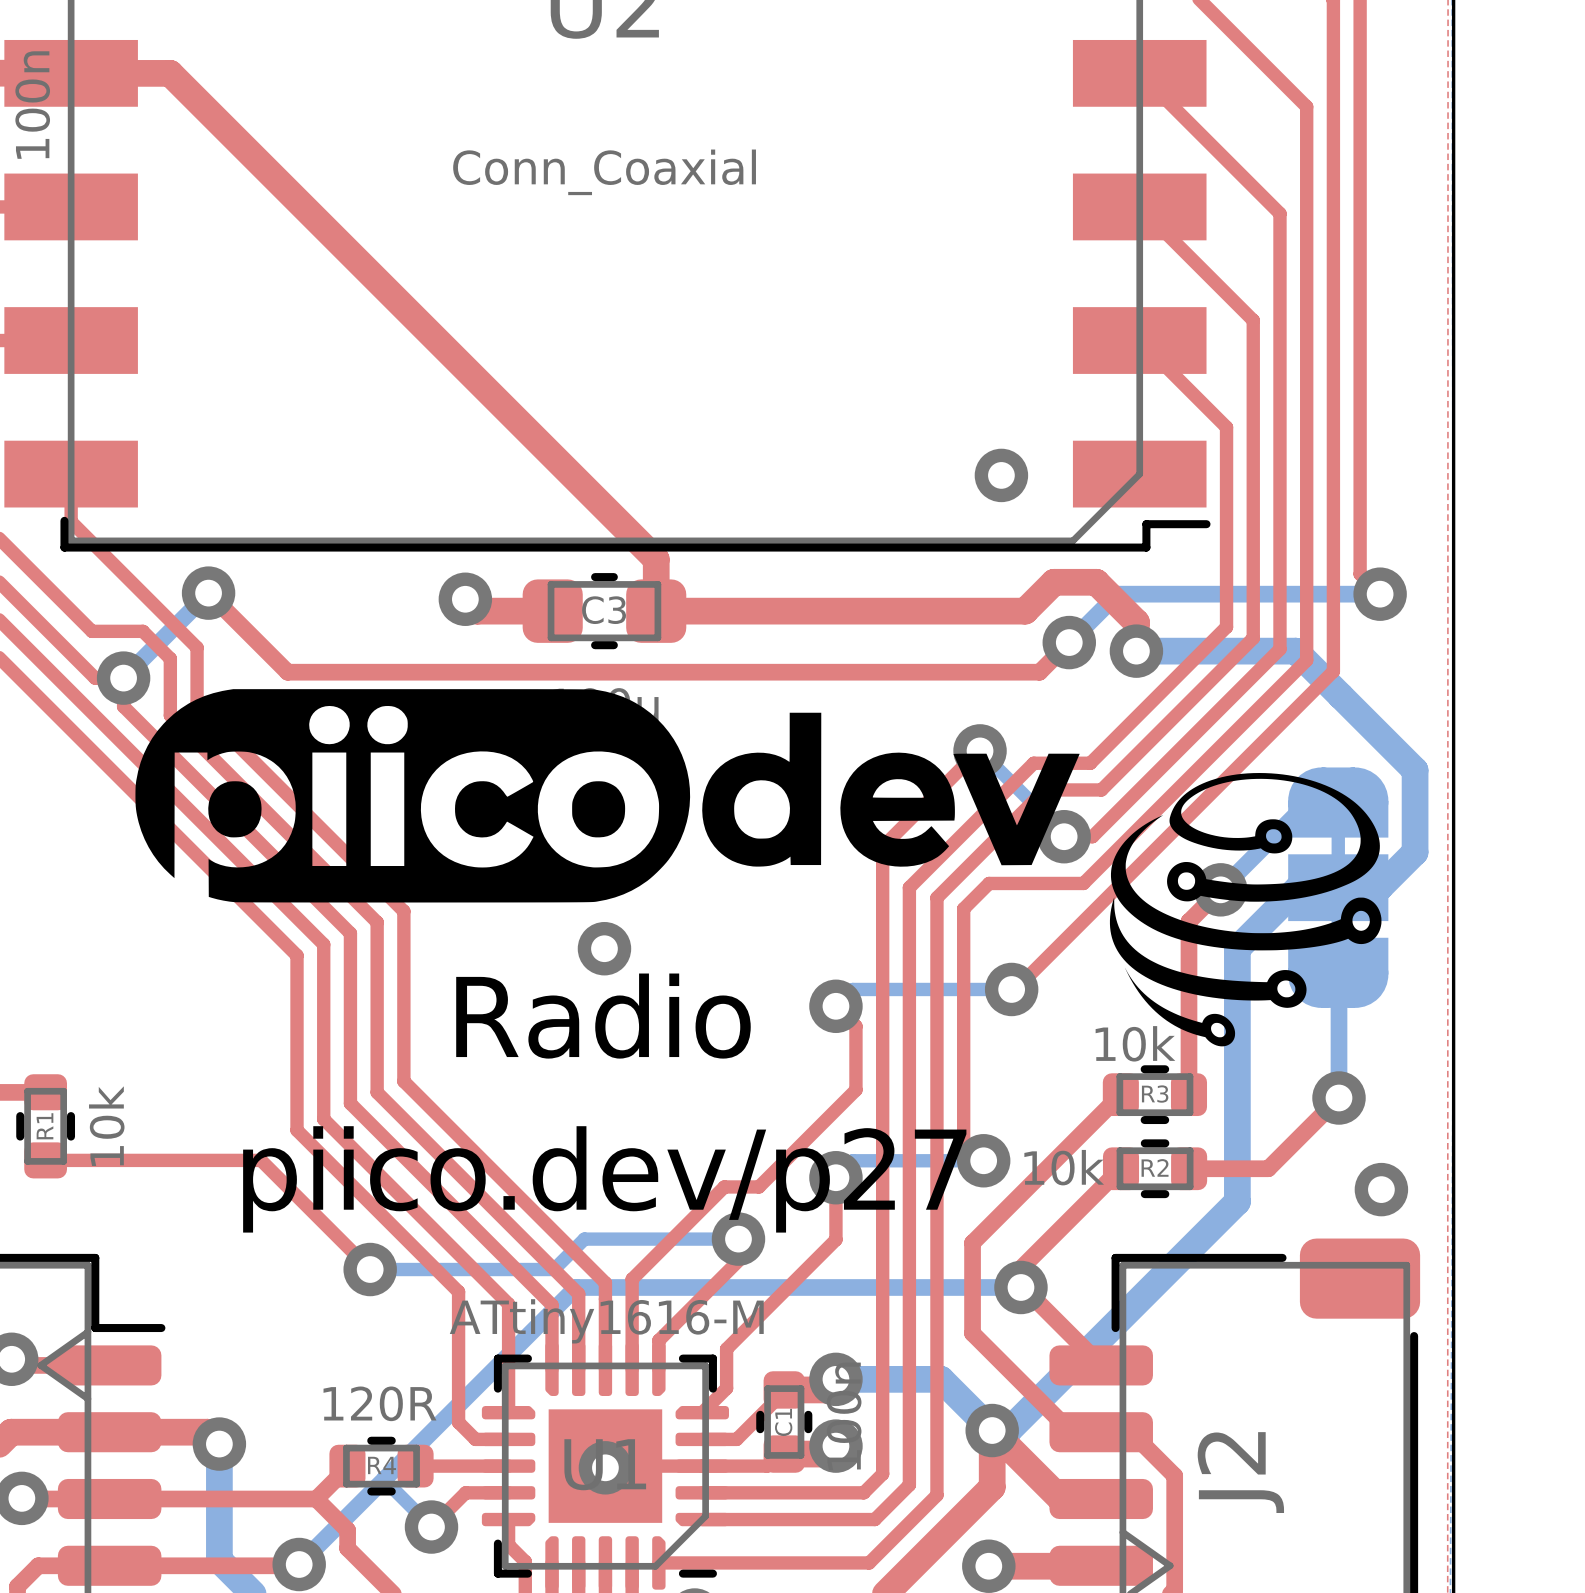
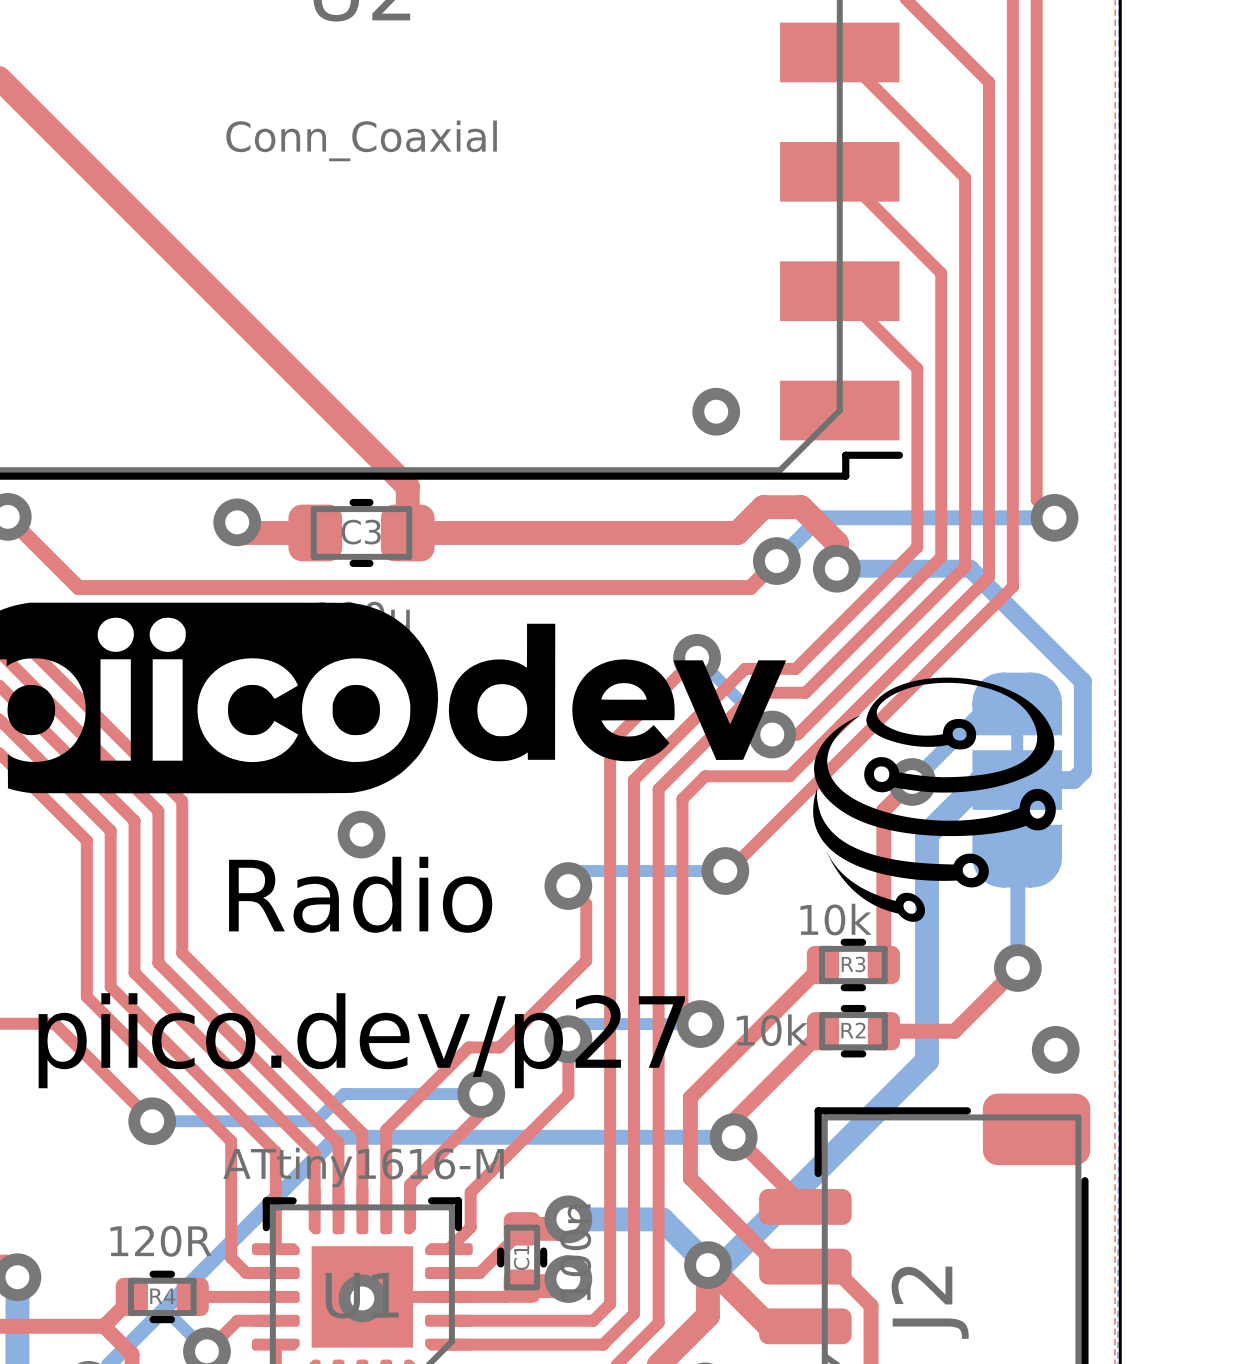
bottom track width: thick (1136, 651) (1285, 651) -> thin (836, 568) (970, 568)
bottom track: (1285, 651) (1295, 651) (1415, 770) (1415, 852) (1379, 887) -> (970, 568) (1082, 681) (1082, 771) (1073, 780) (1017, 780)

